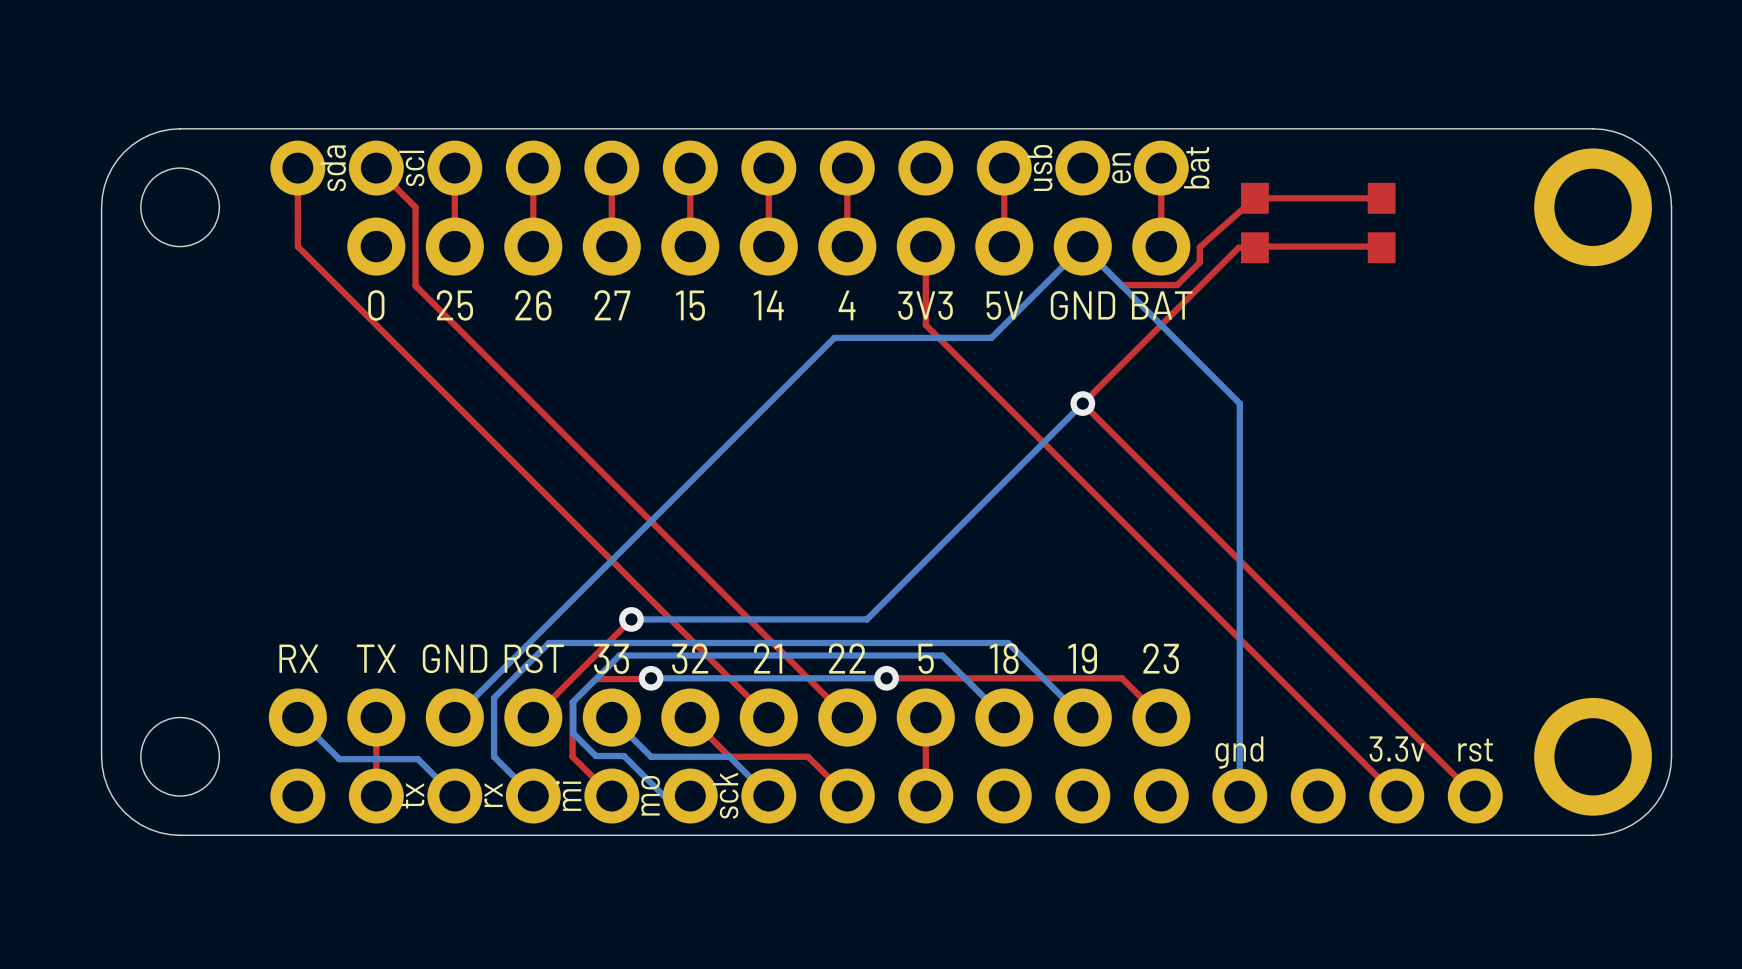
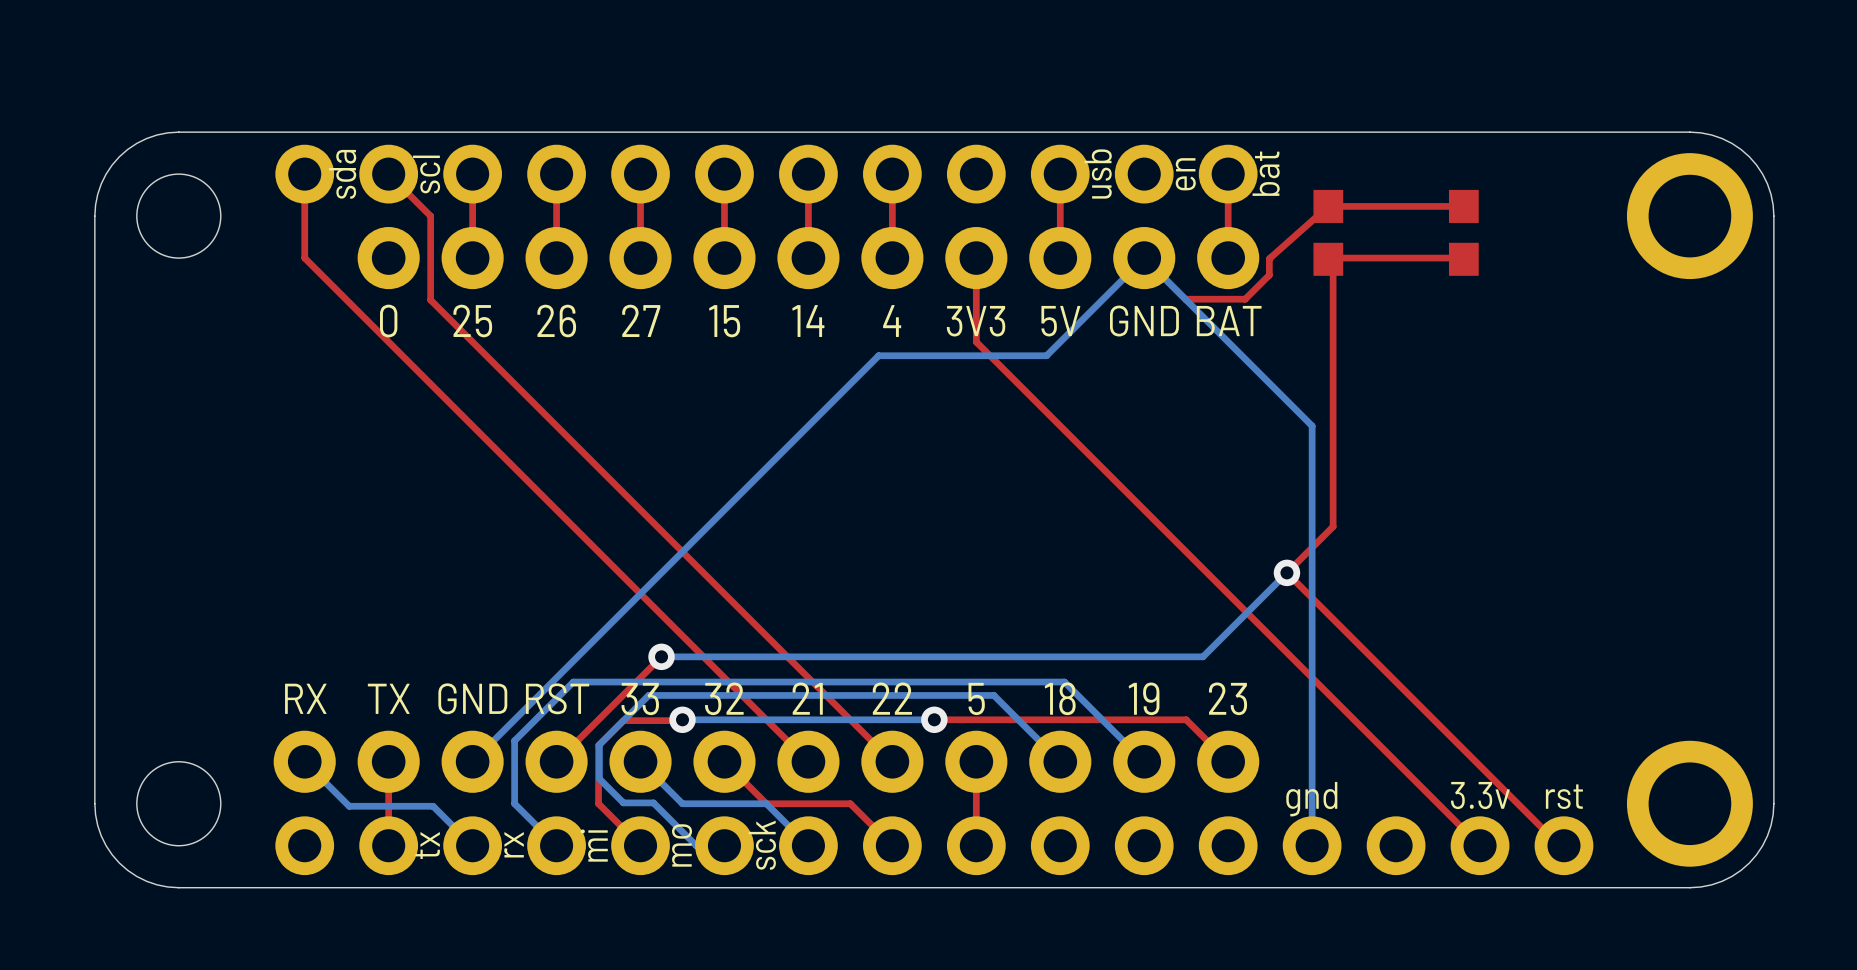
top track: (1254, 247) (1238, 247) (1082, 403) (1475, 796) -> (1333, 258) (1333, 526) (1286, 572) (1559, 845) (1564, 845)
bottom track: (1082, 403) (866, 619) -> (1286, 572) (1203, 656) (913, 656)
via: (1082, 403) -> none
via: none -> (1286, 572)

